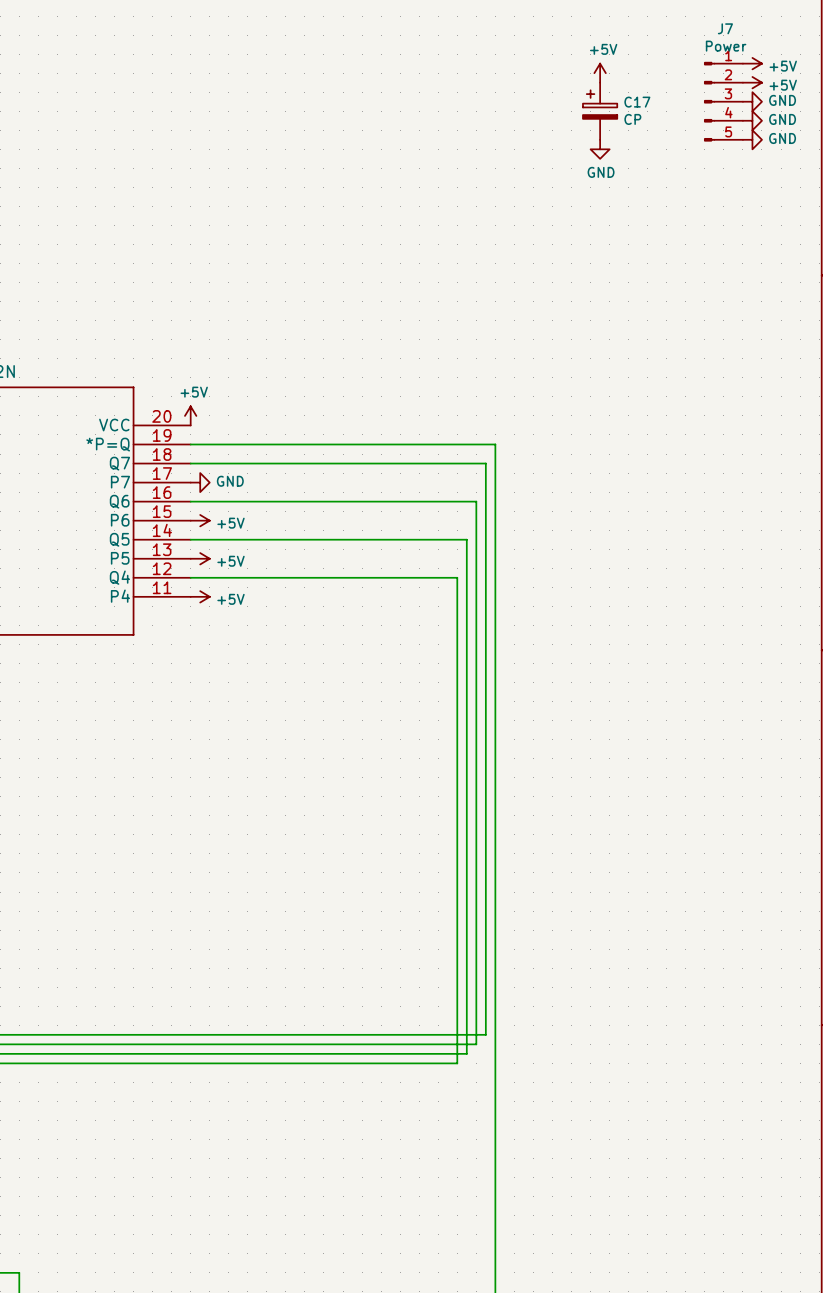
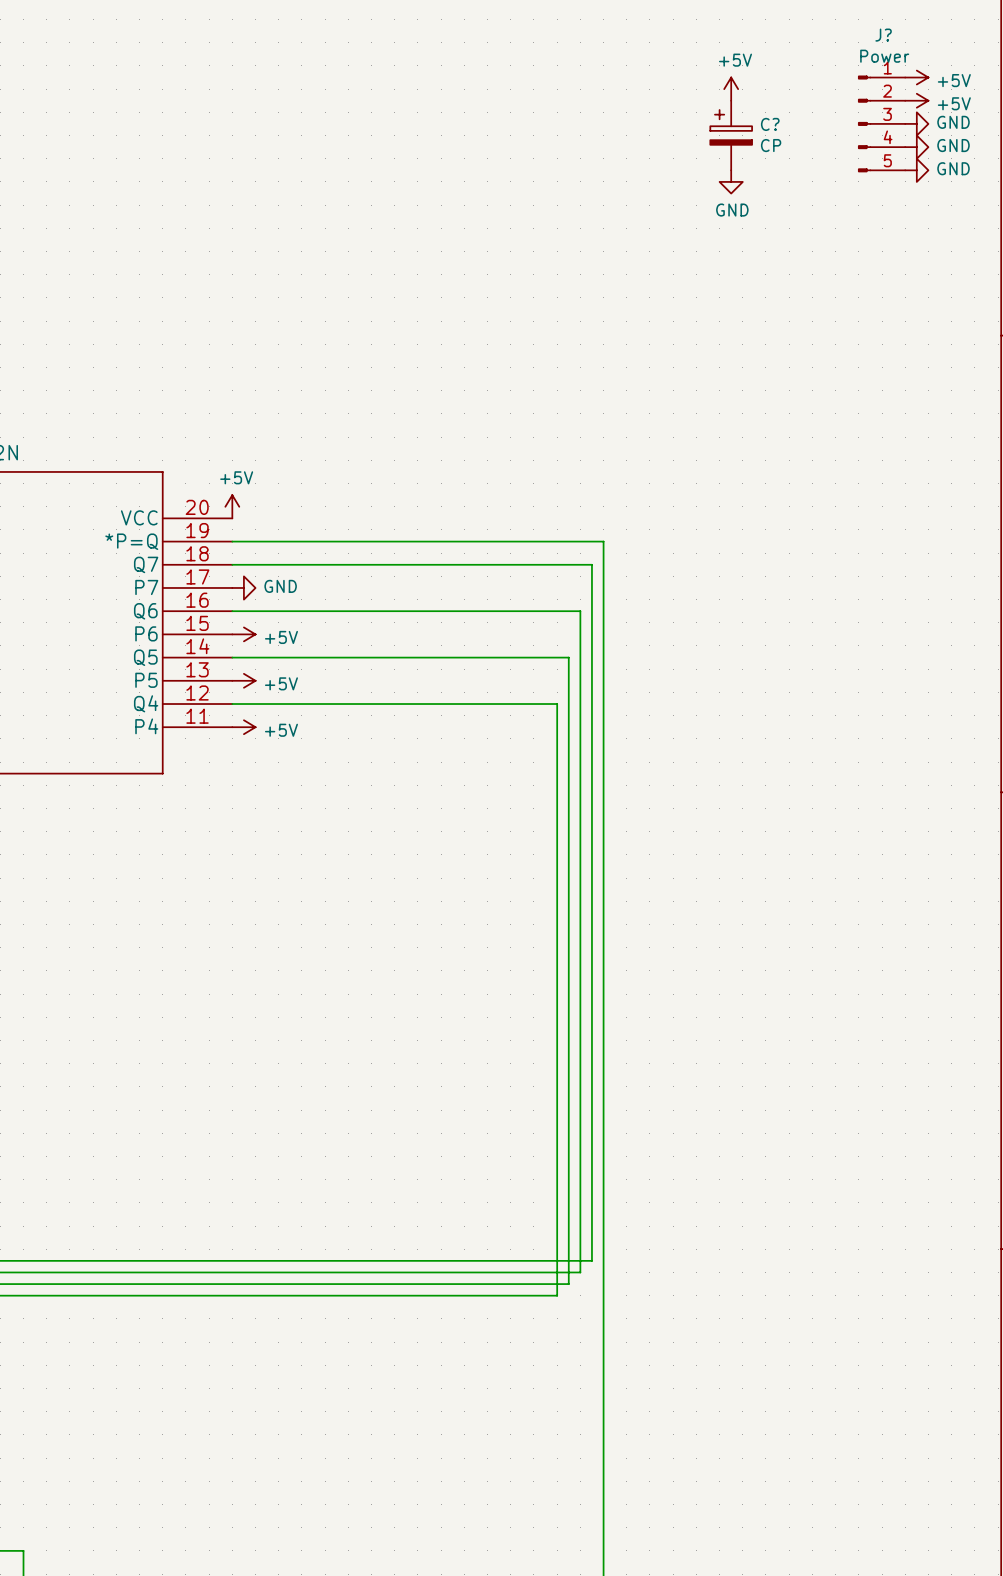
J7 name: J7 (725, 28) -> J? (883, 35)
C17 name: C17 (637, 102) -> C? (770, 124)

